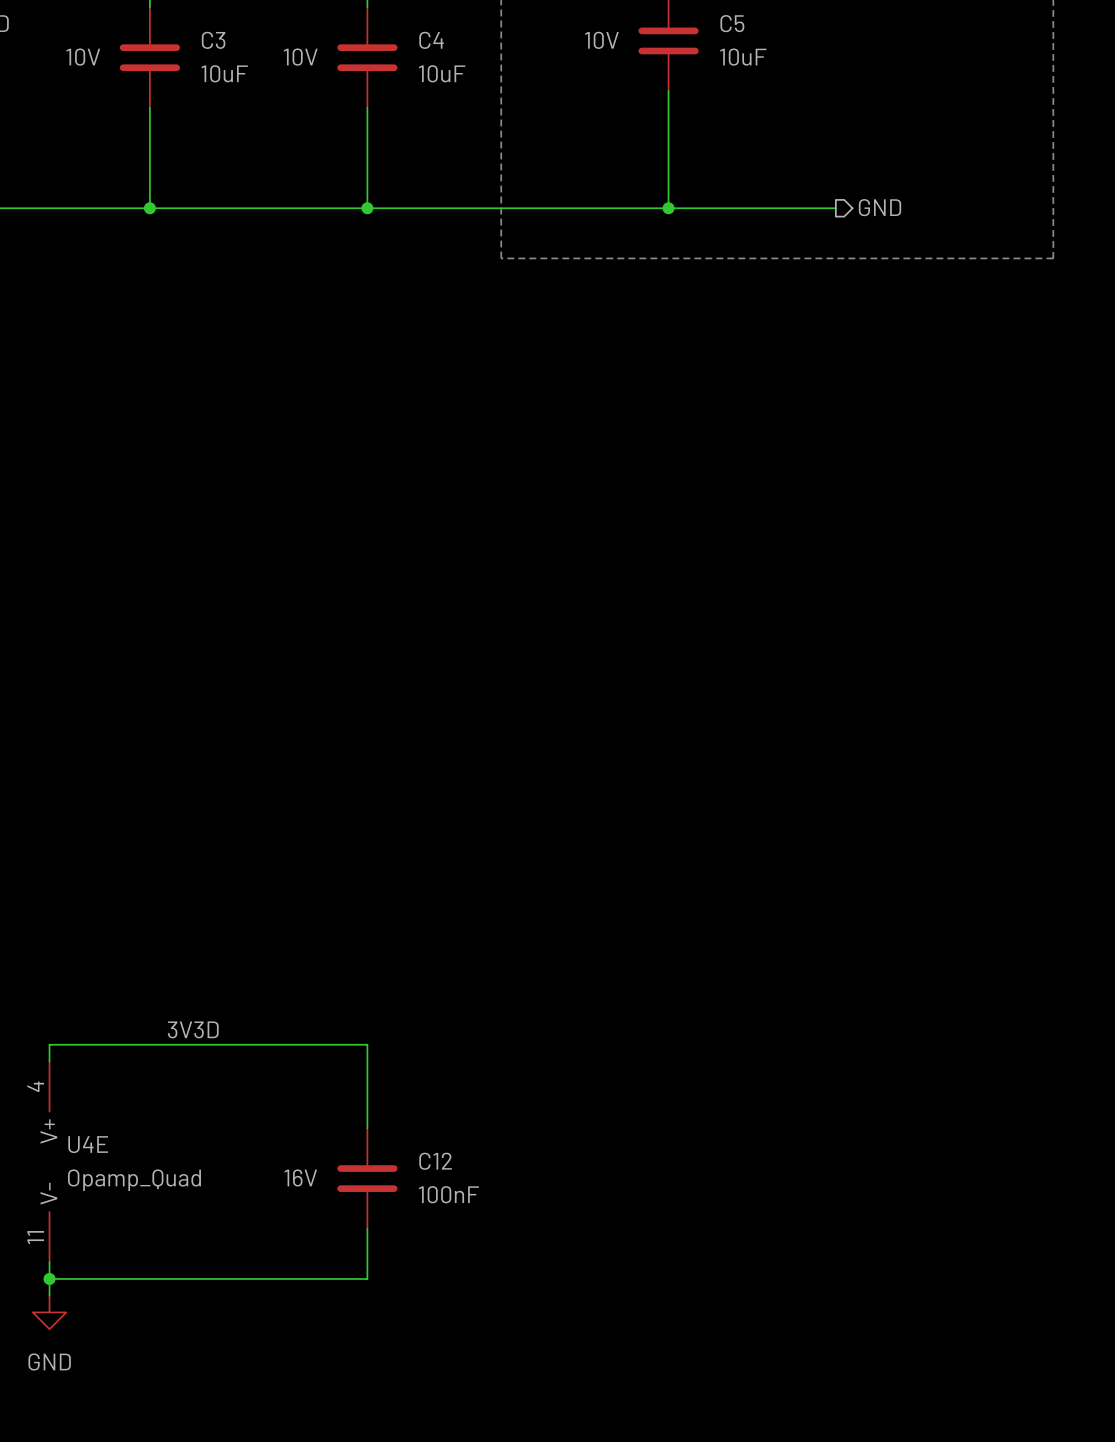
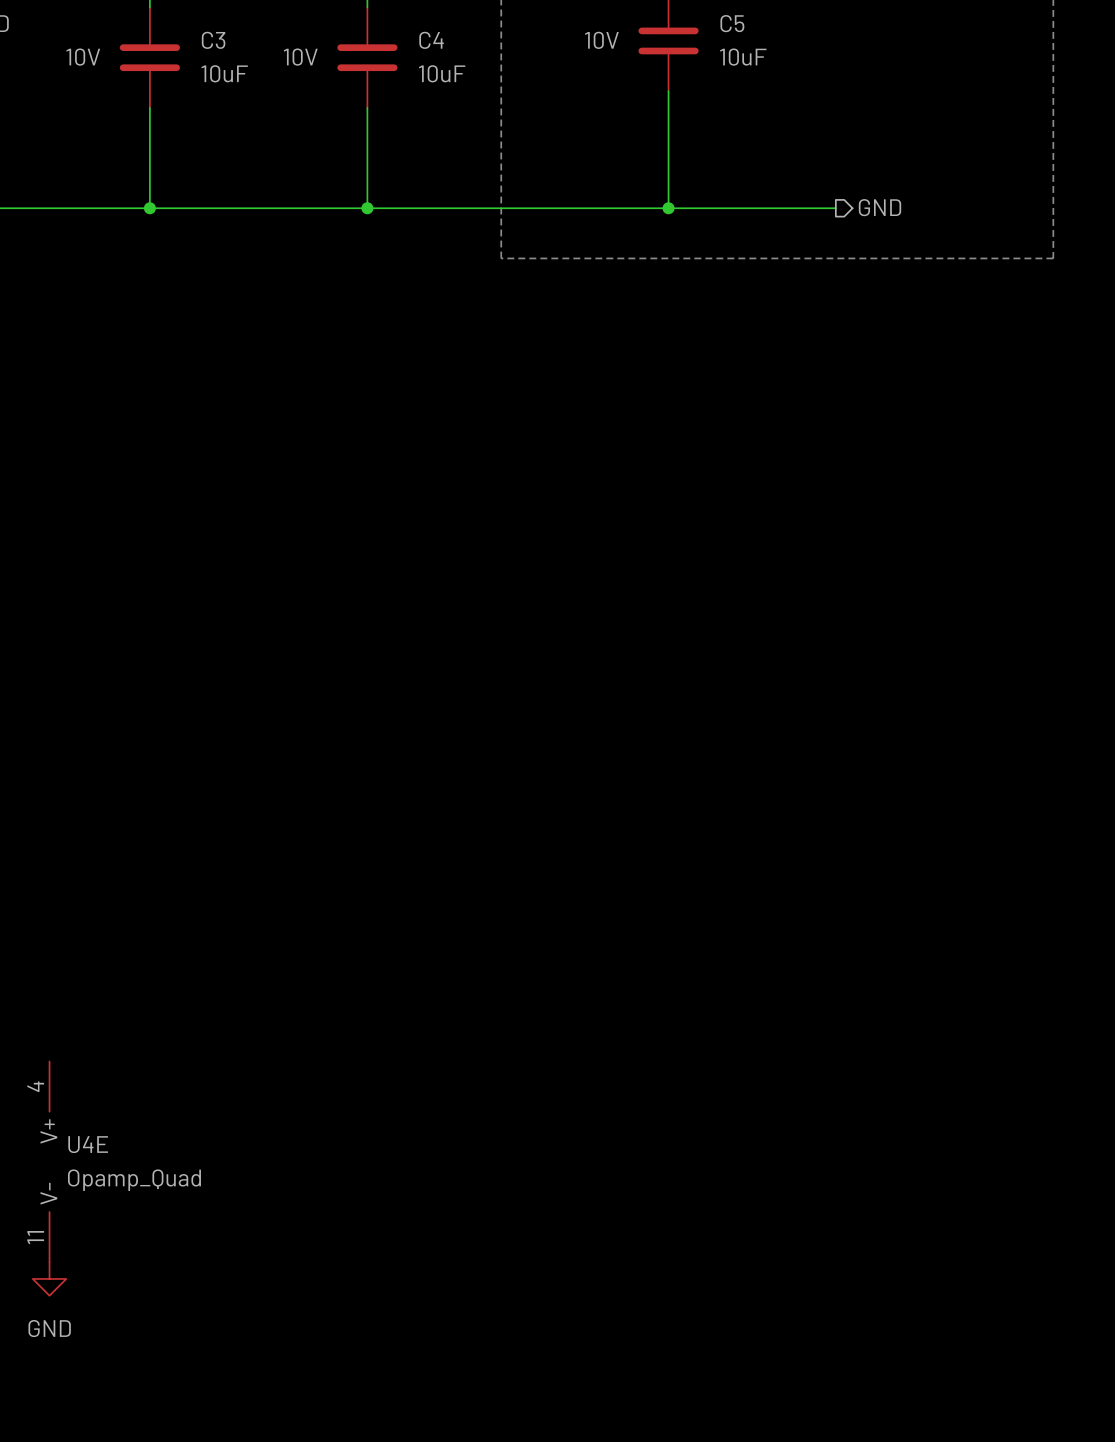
label: 3V3D (193, 1029) -> none
wire: (49, 1061) (49, 1044) (367, 1044) (367, 1128) -> none
C12: 100nF (367, 1178) -> none
wire: (367, 1228) (367, 1278) (49, 1278) -> none
junction: (49, 1278) -> none
power symbol position: GND (49, 1312) -> GND (49, 1278)

